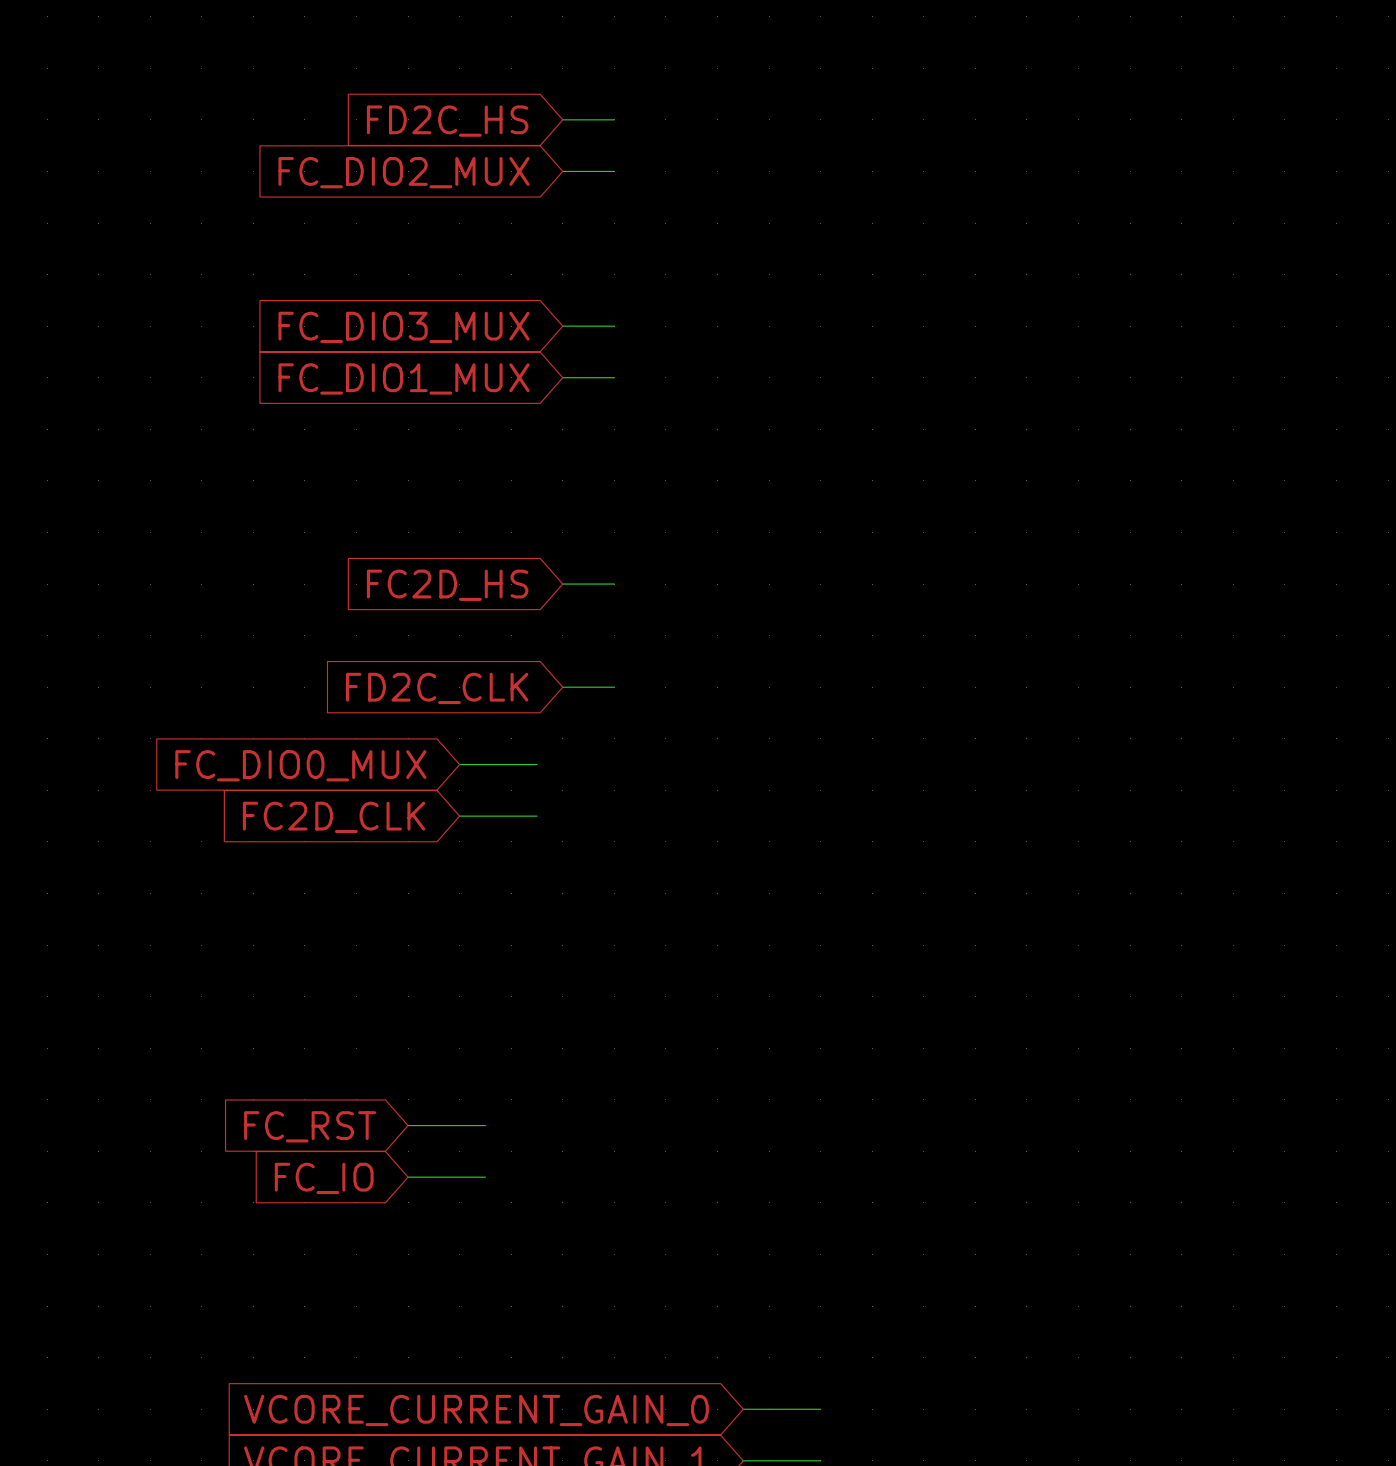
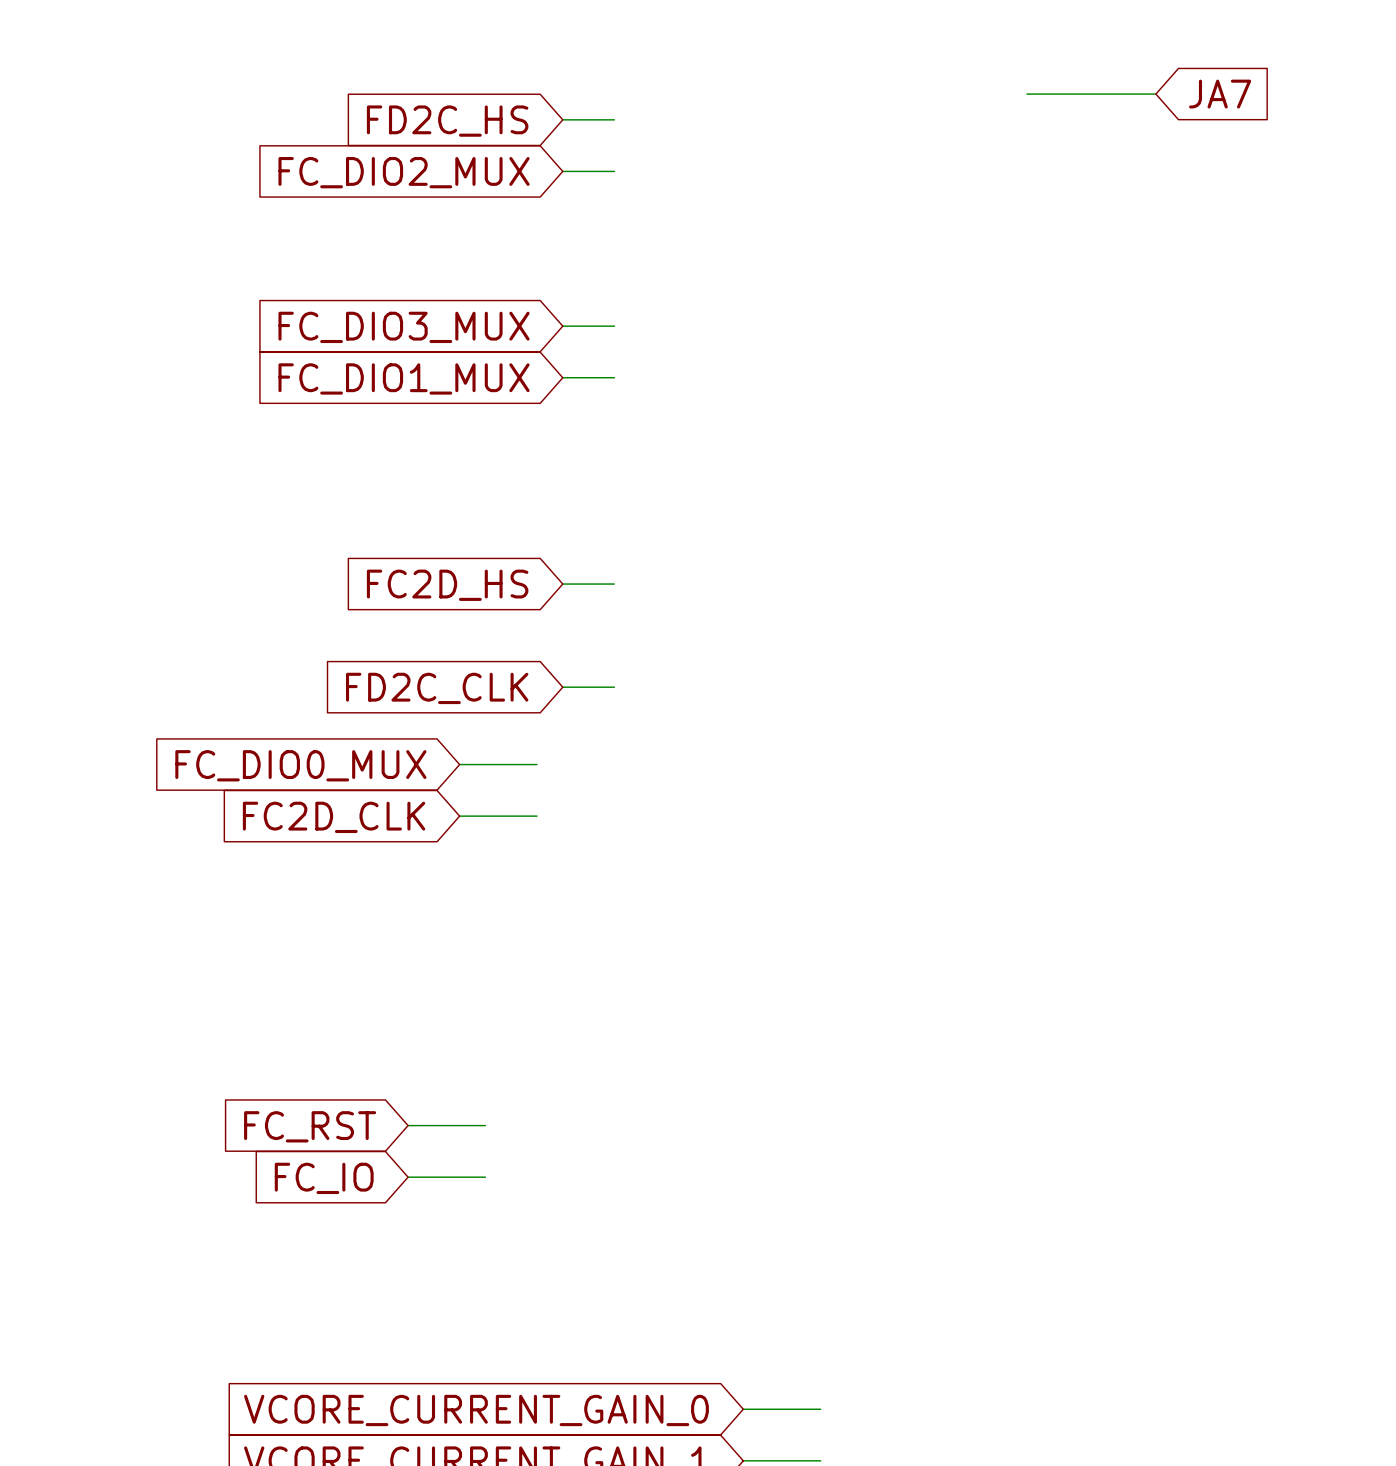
wire: none -> (1026, 94) (1155, 94)
global label: none -> JA7 (1220, 94)

